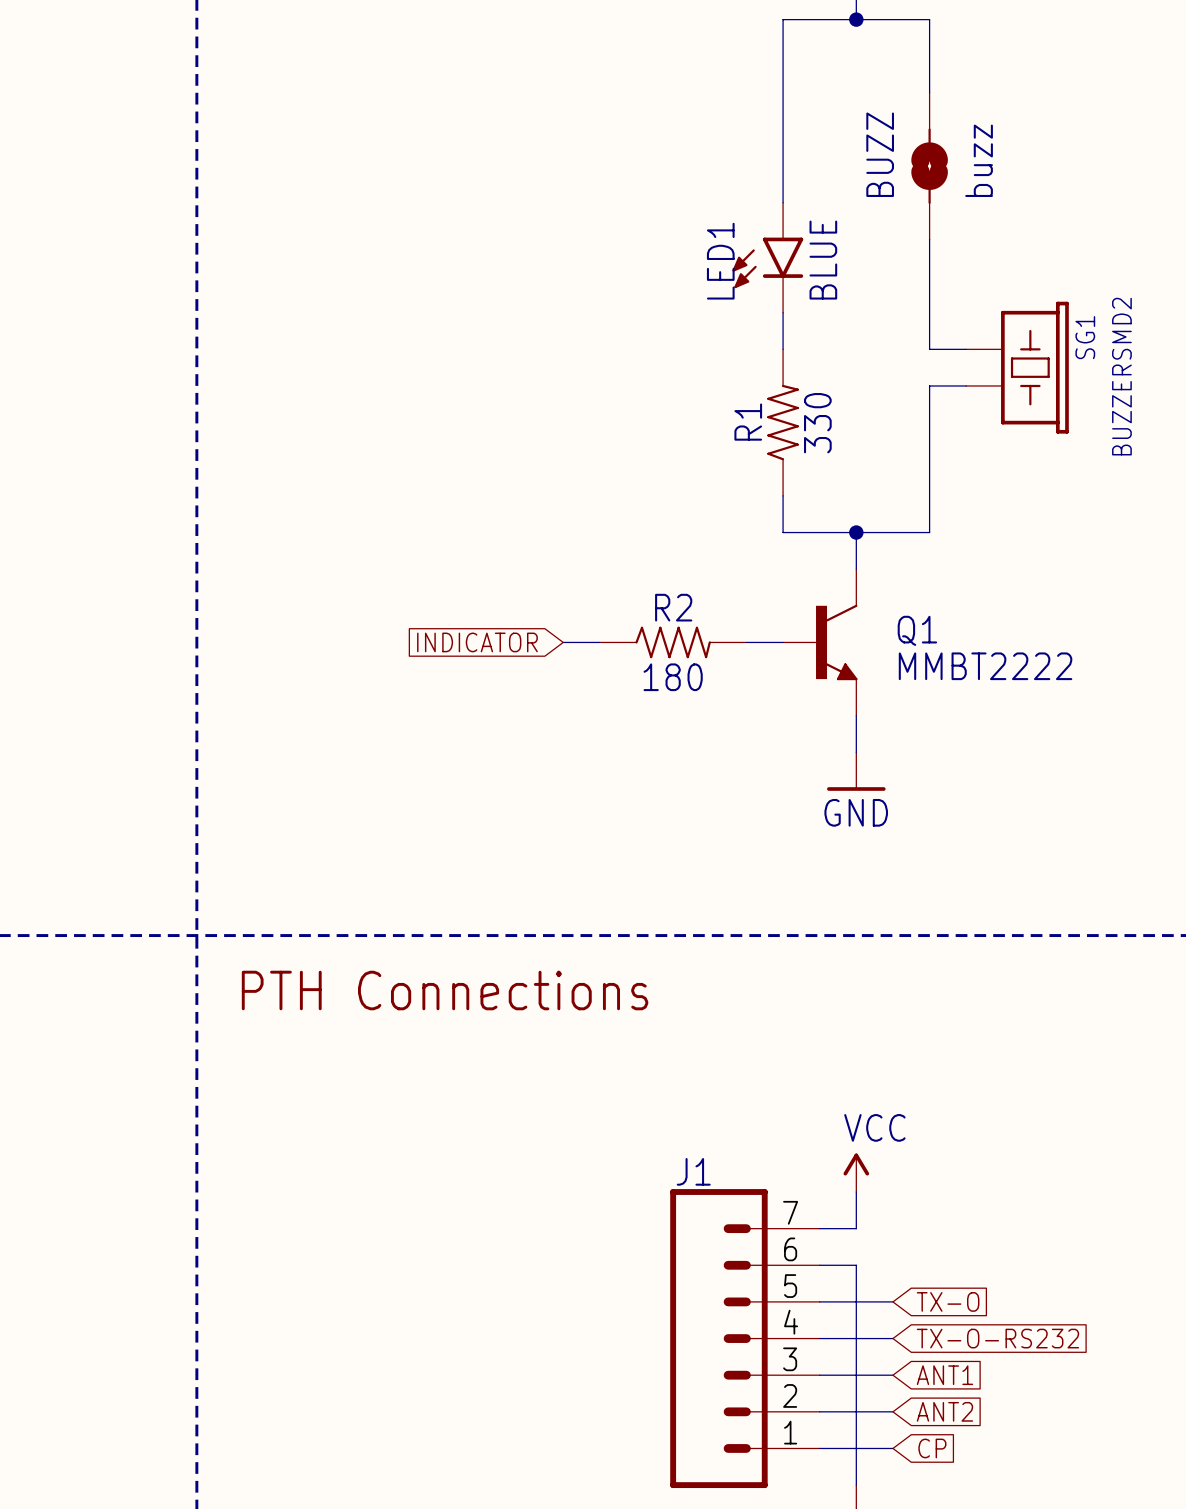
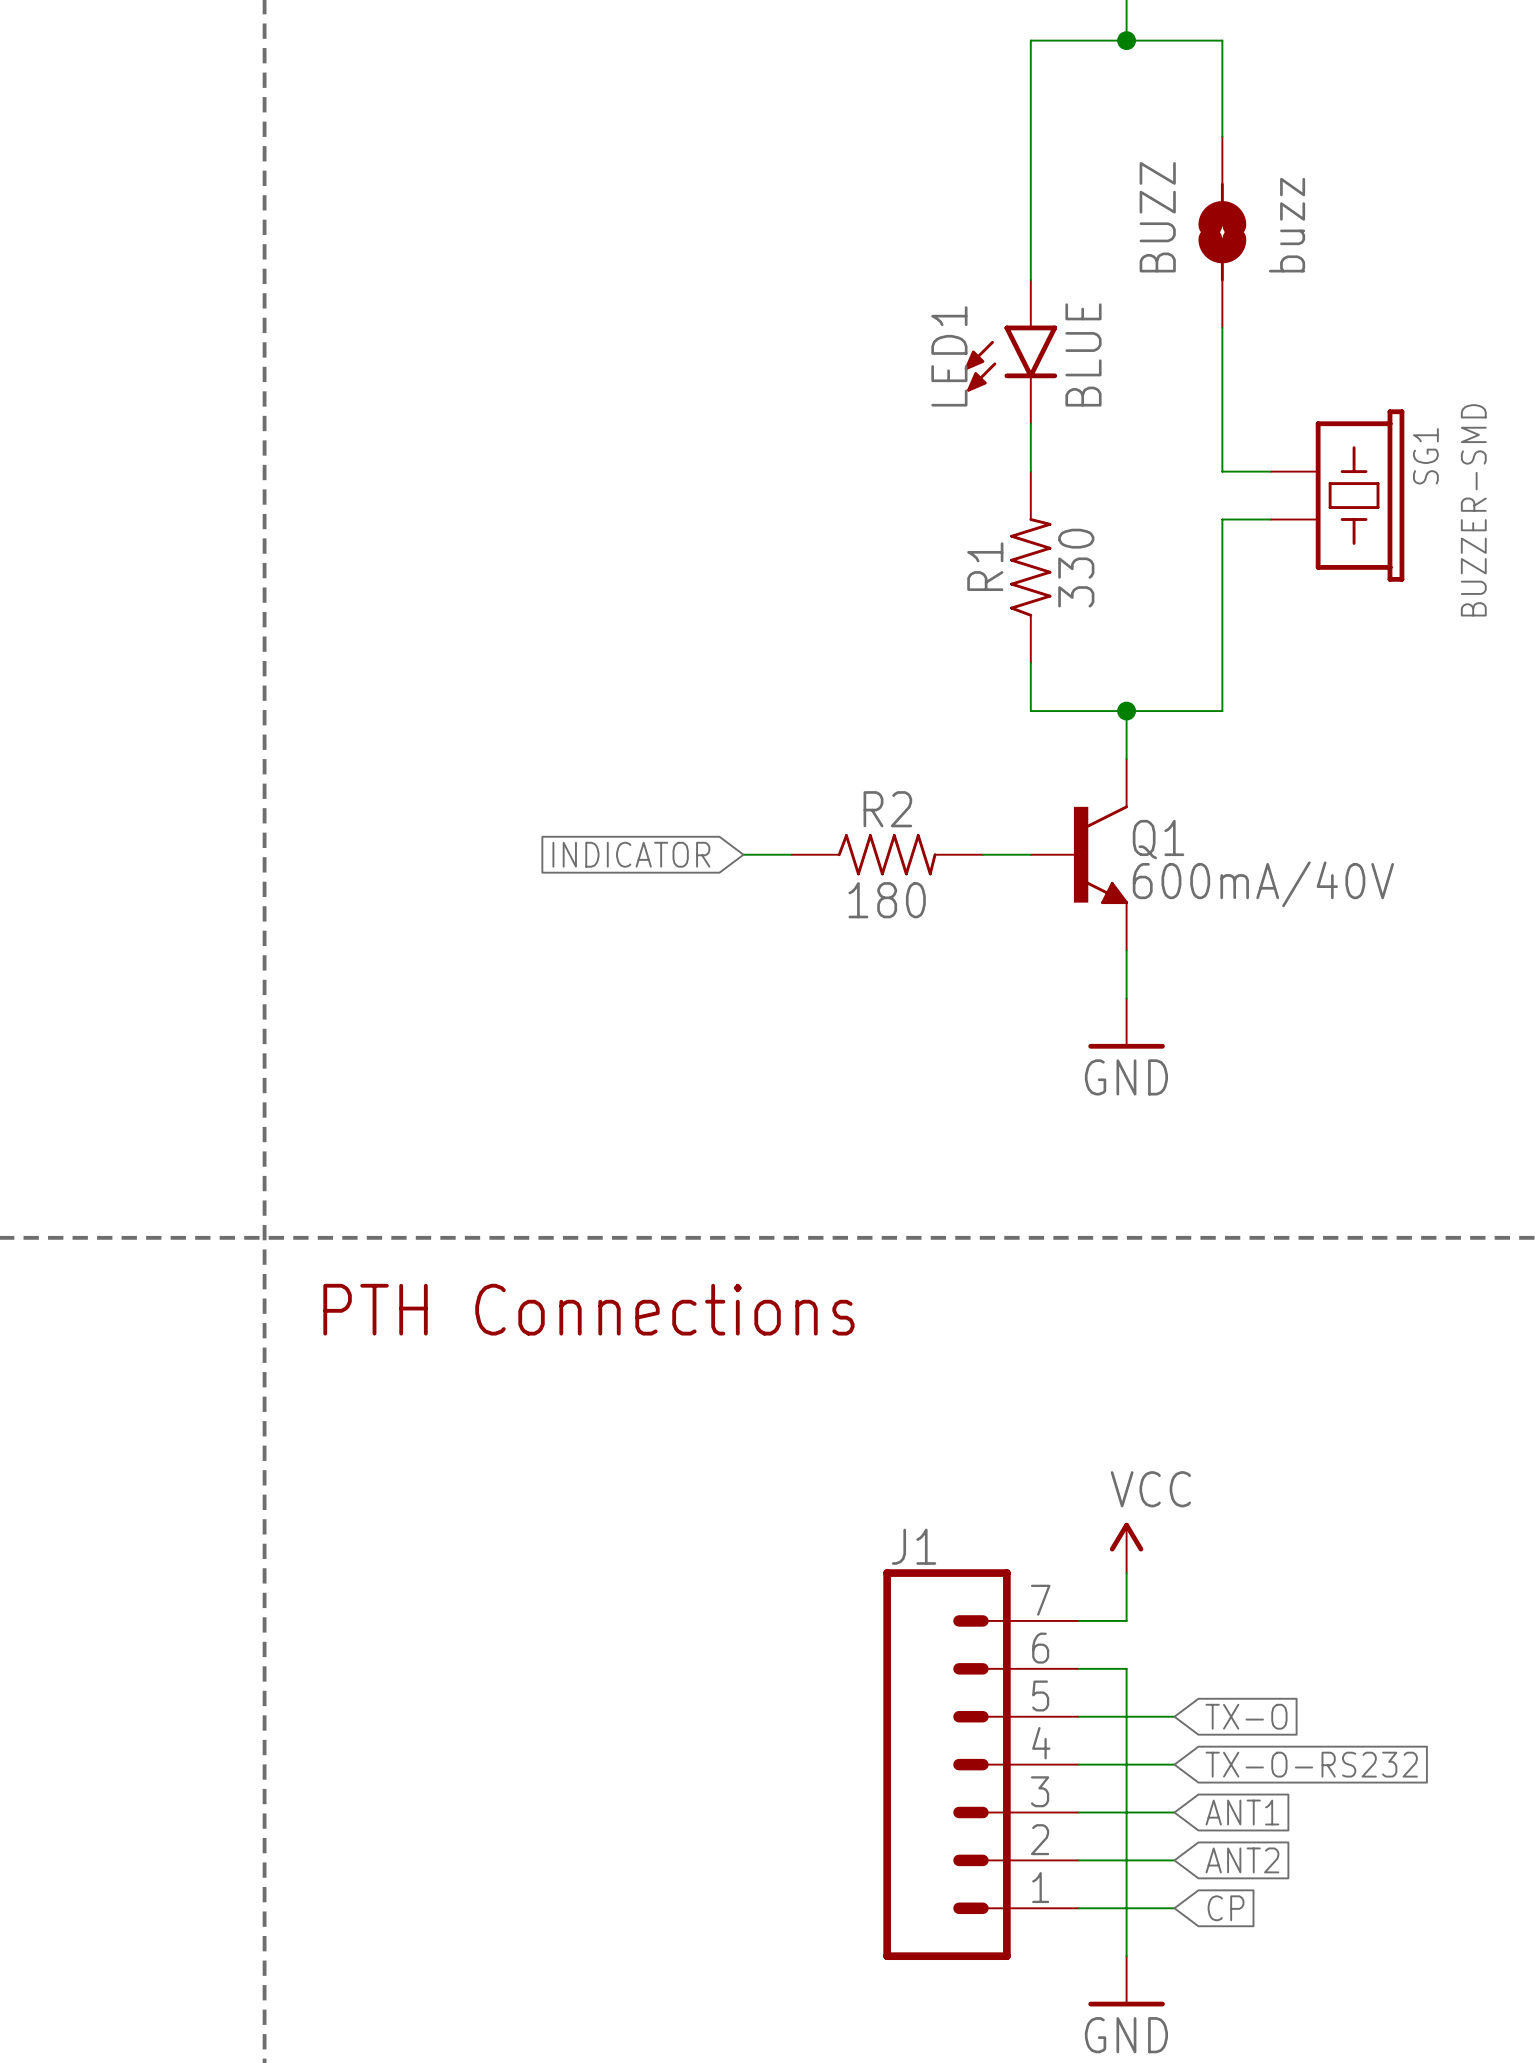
SG1 value: BUZZERSMD2 (1121, 376) -> BUZZER-SMD (1473, 510)
Q1 name position: Q1 (917, 630) -> Q1 (1158, 839)
Q1 value: MMBT2222 (985, 666) -> 600mA/40V (1263, 884)

